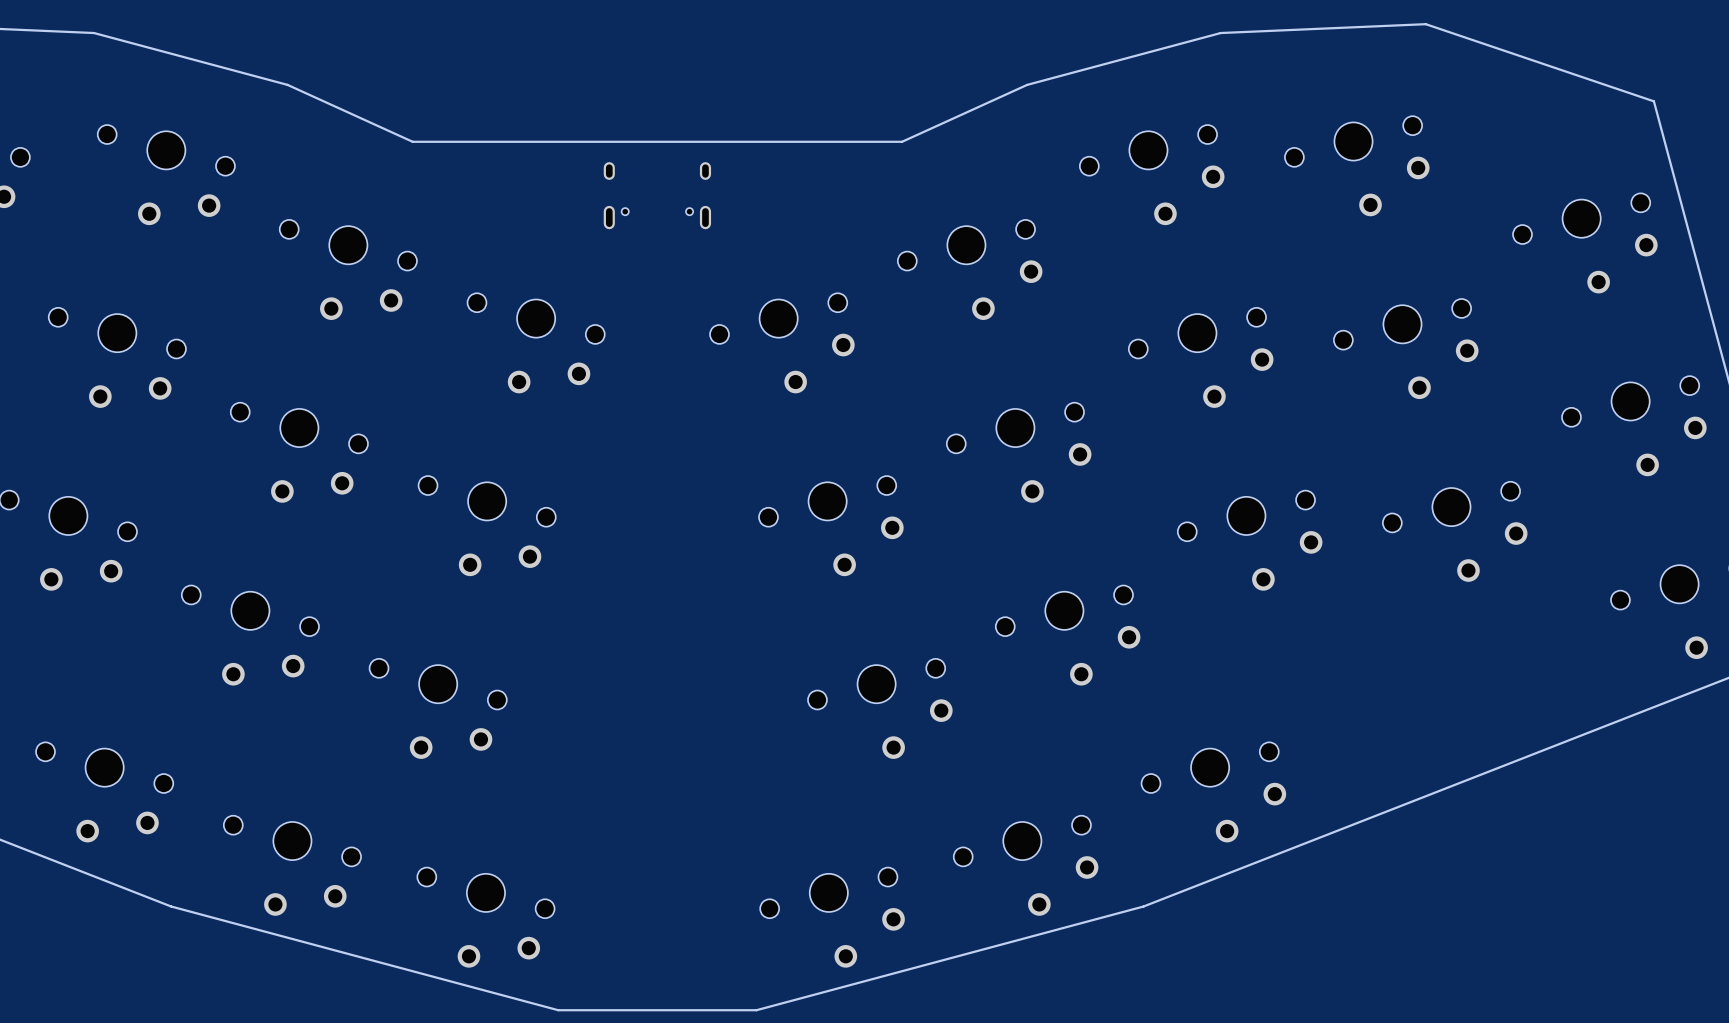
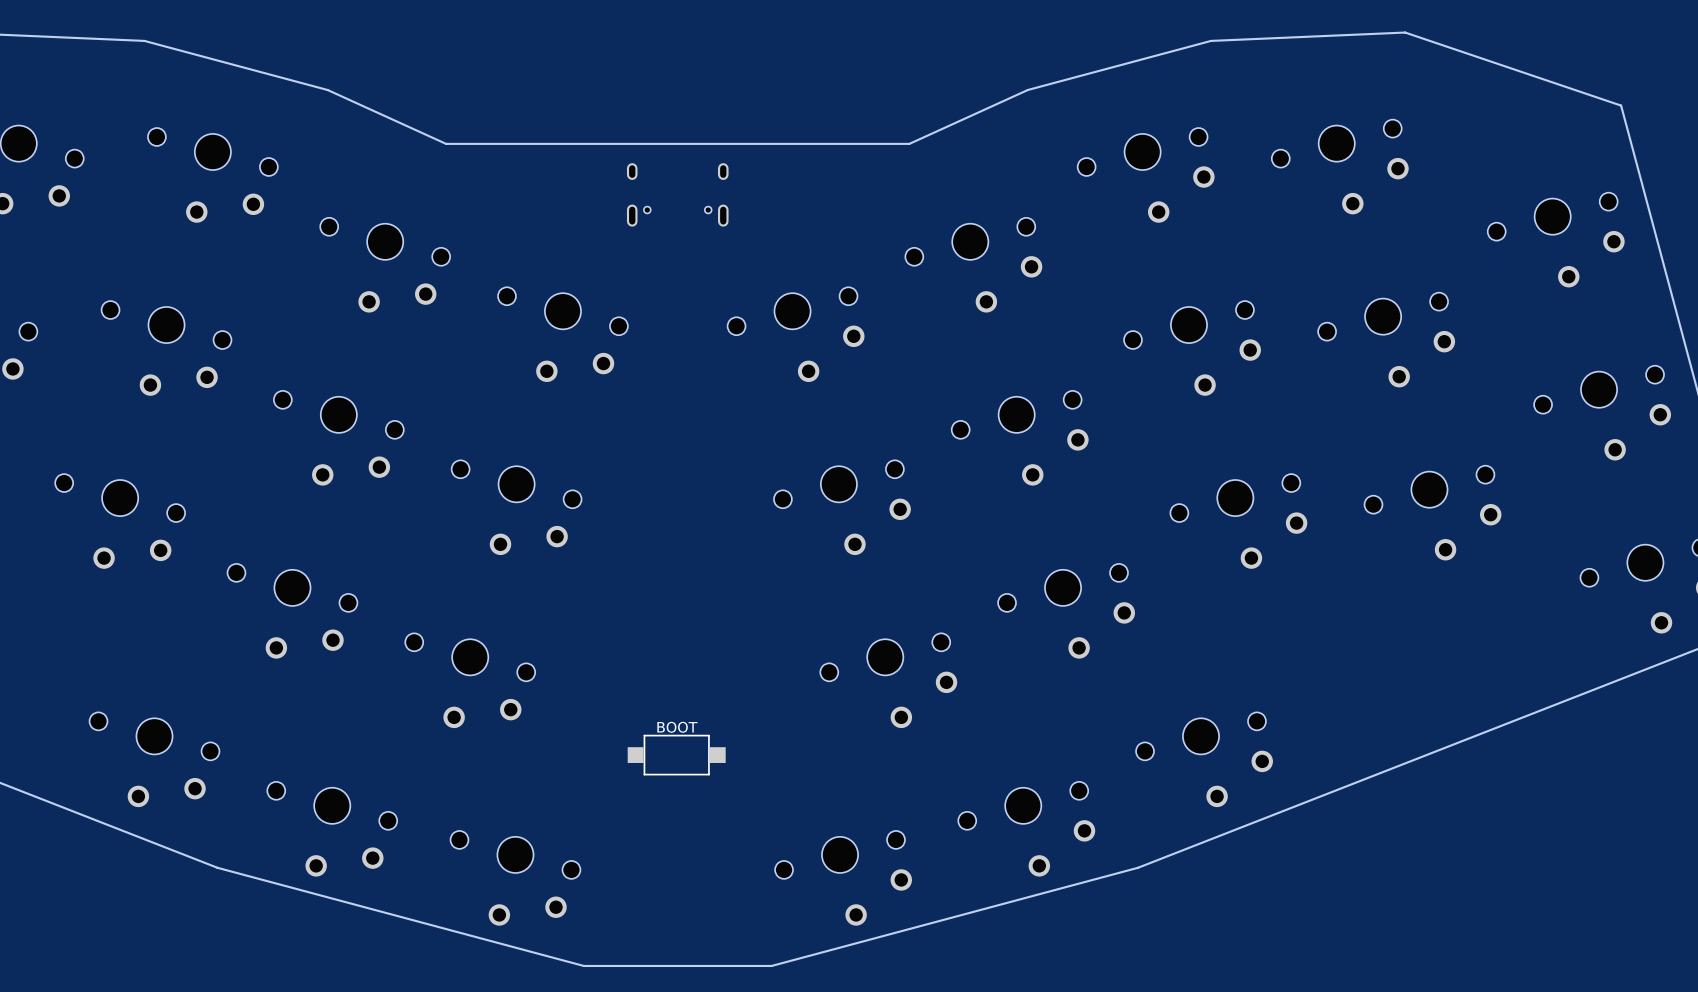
BOOT: none -> (676, 755)

